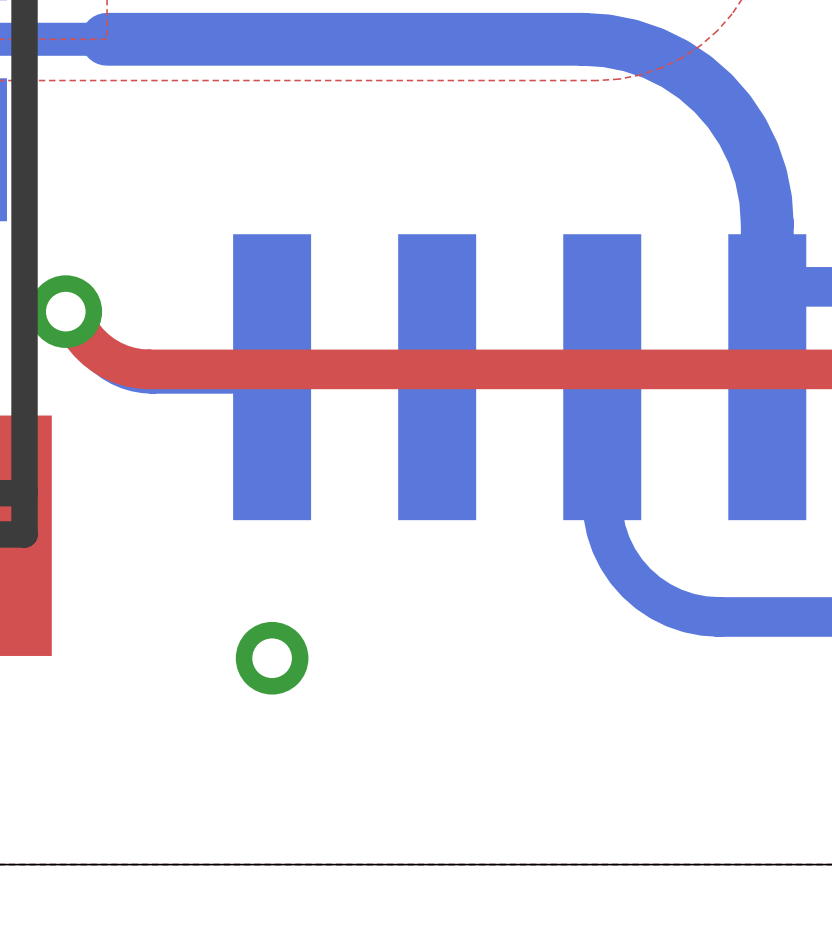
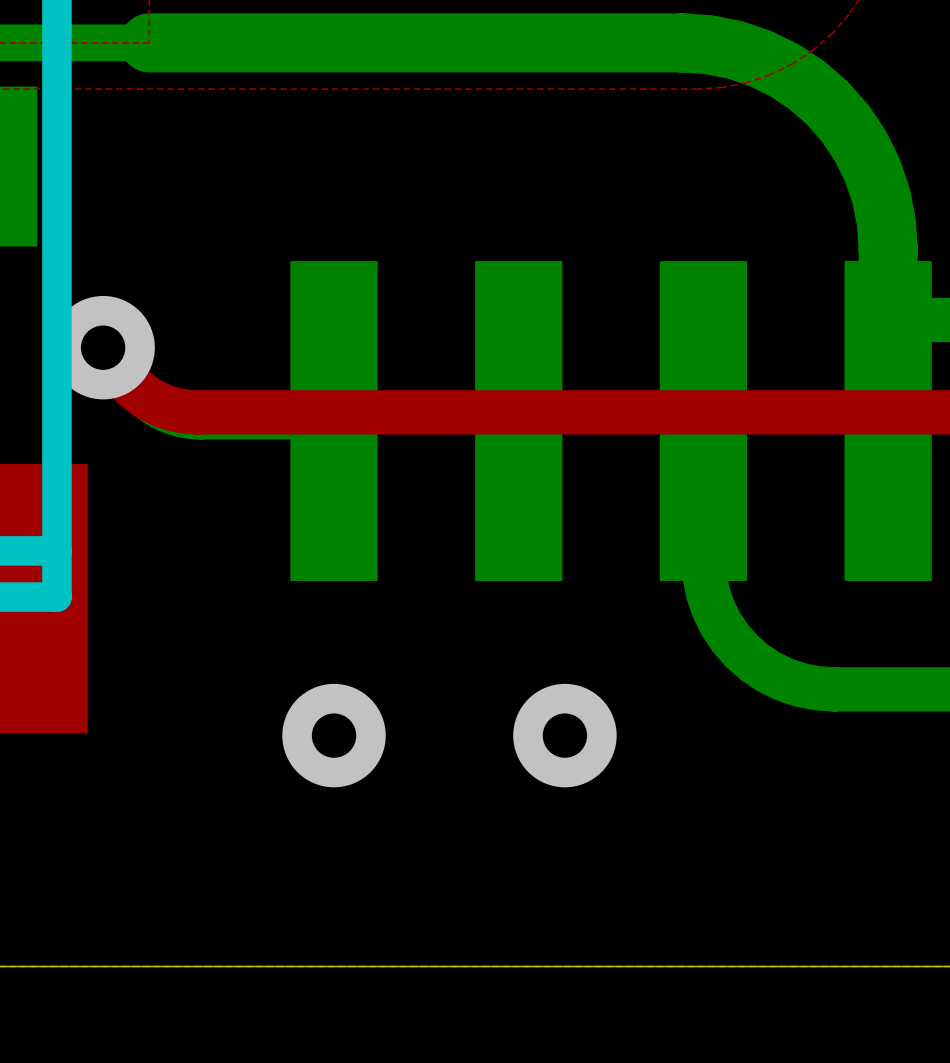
via size: [29, 275, 103, 348] -> [51, 295, 155, 400]
via size: [235, 621, 309, 695] -> [282, 683, 386, 788]
via: none -> (564, 735)

